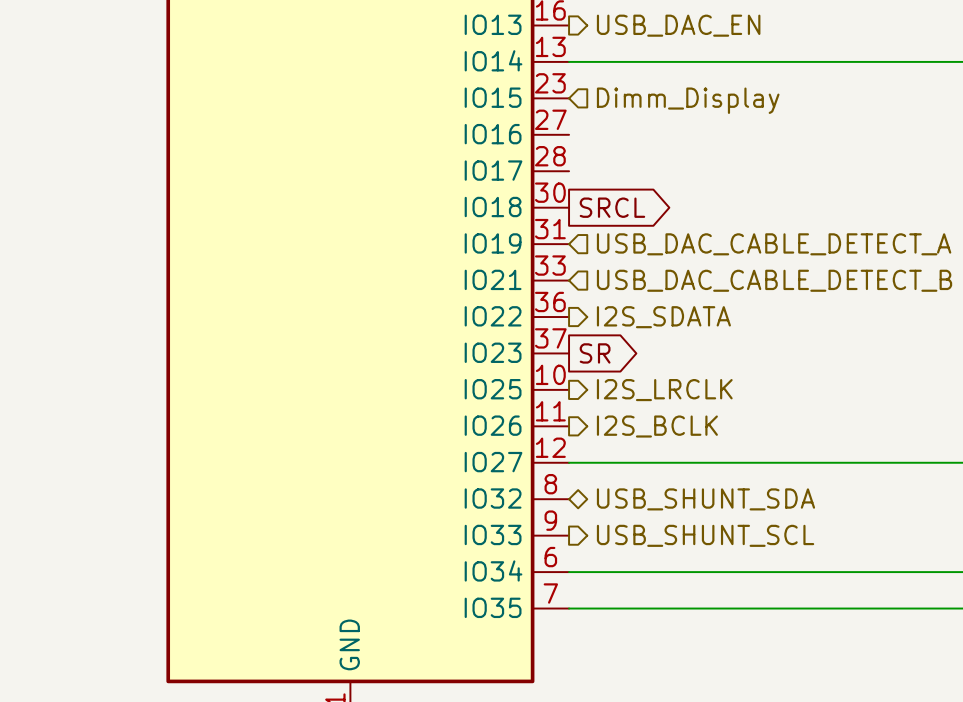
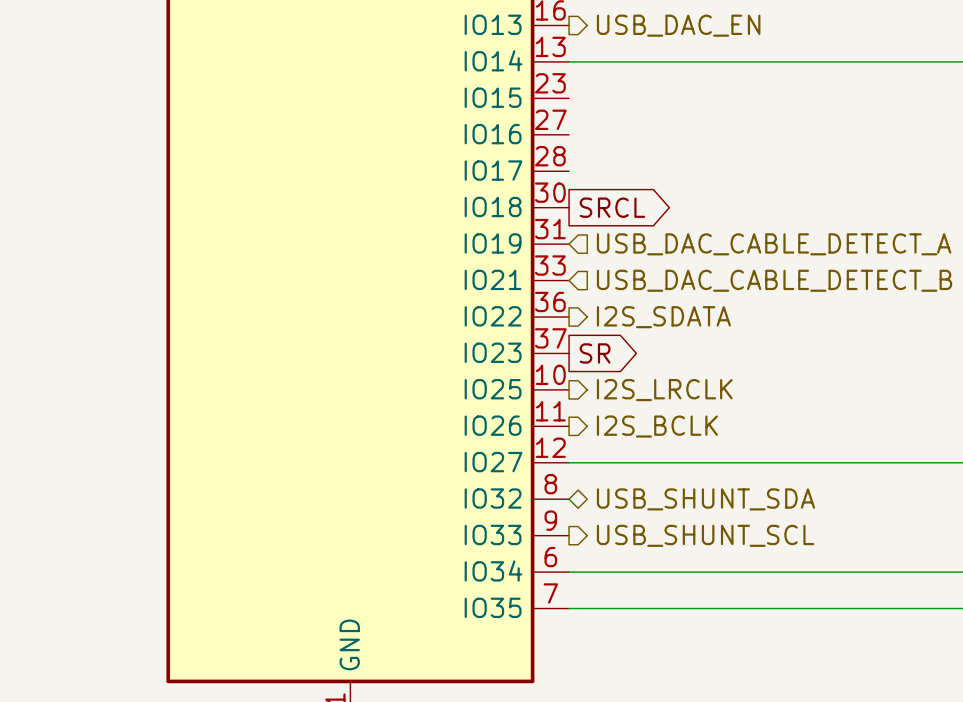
hierarchical label: Dimm_Display (688, 100) -> none

